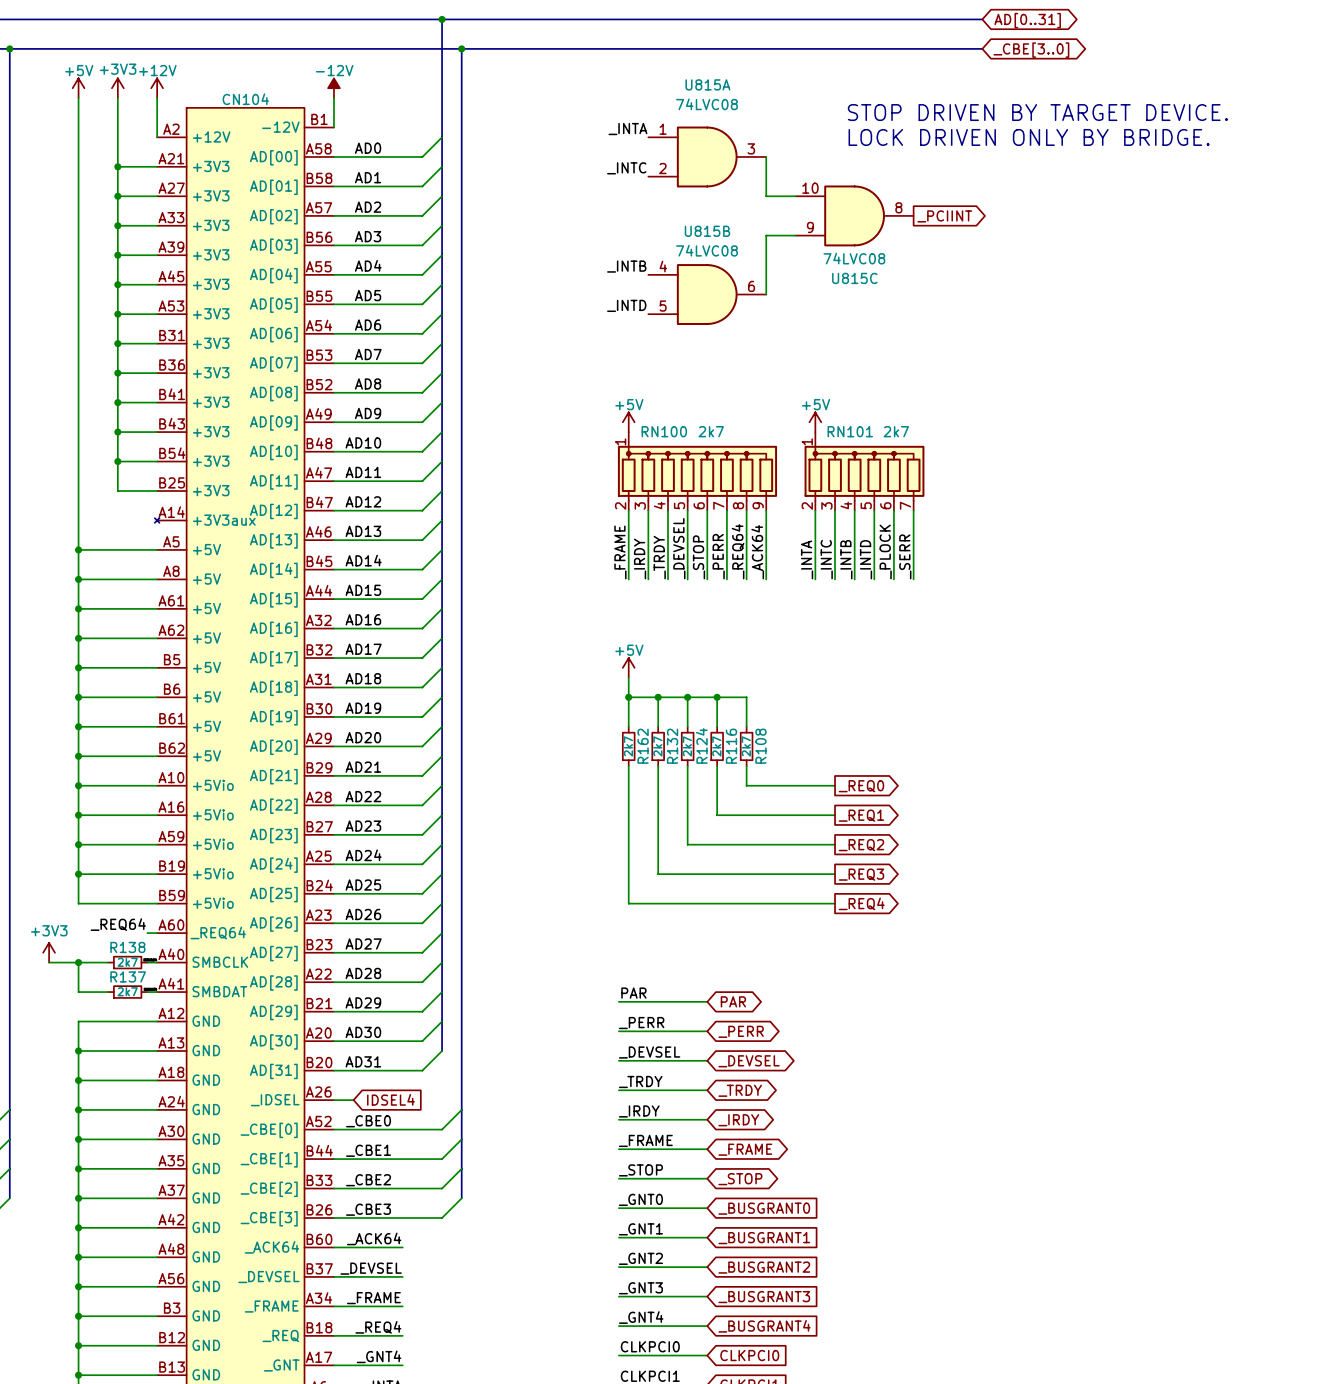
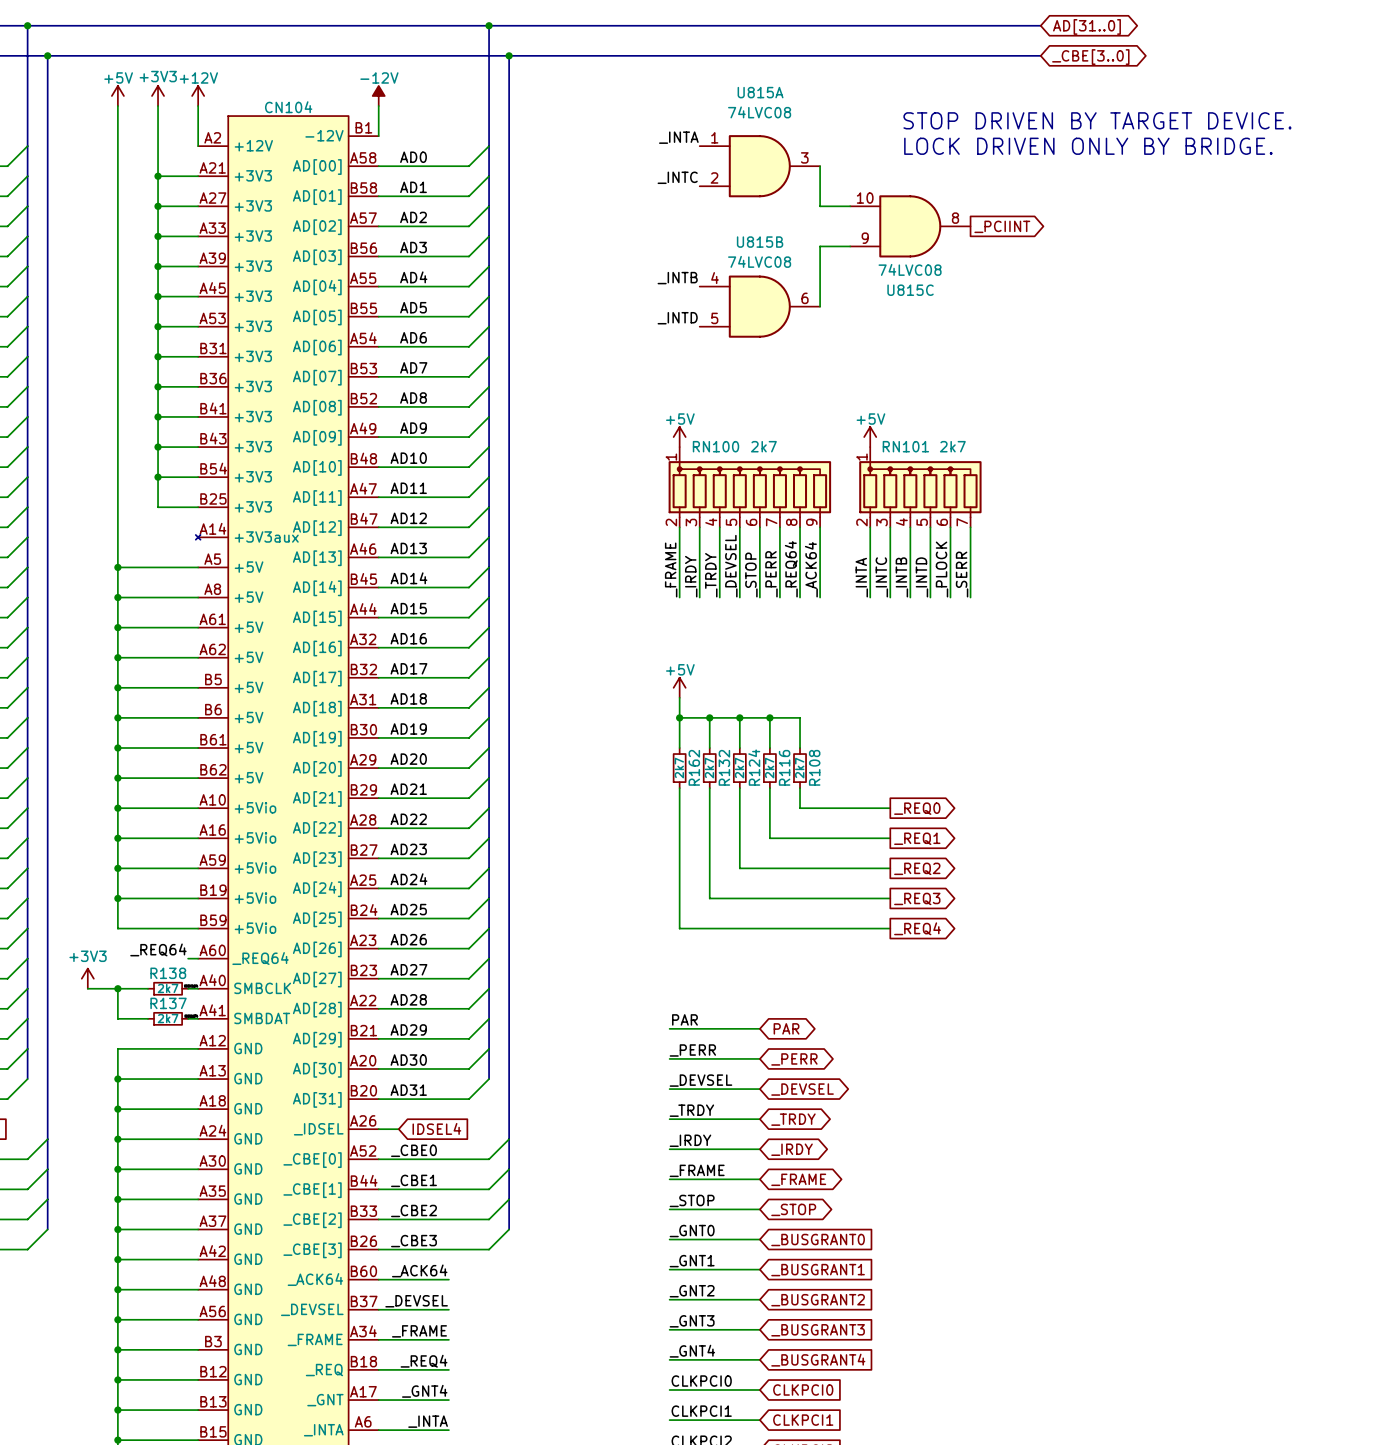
global label: AD[0..31] (1027, 20) -> AD[31..0] (1086, 26)

